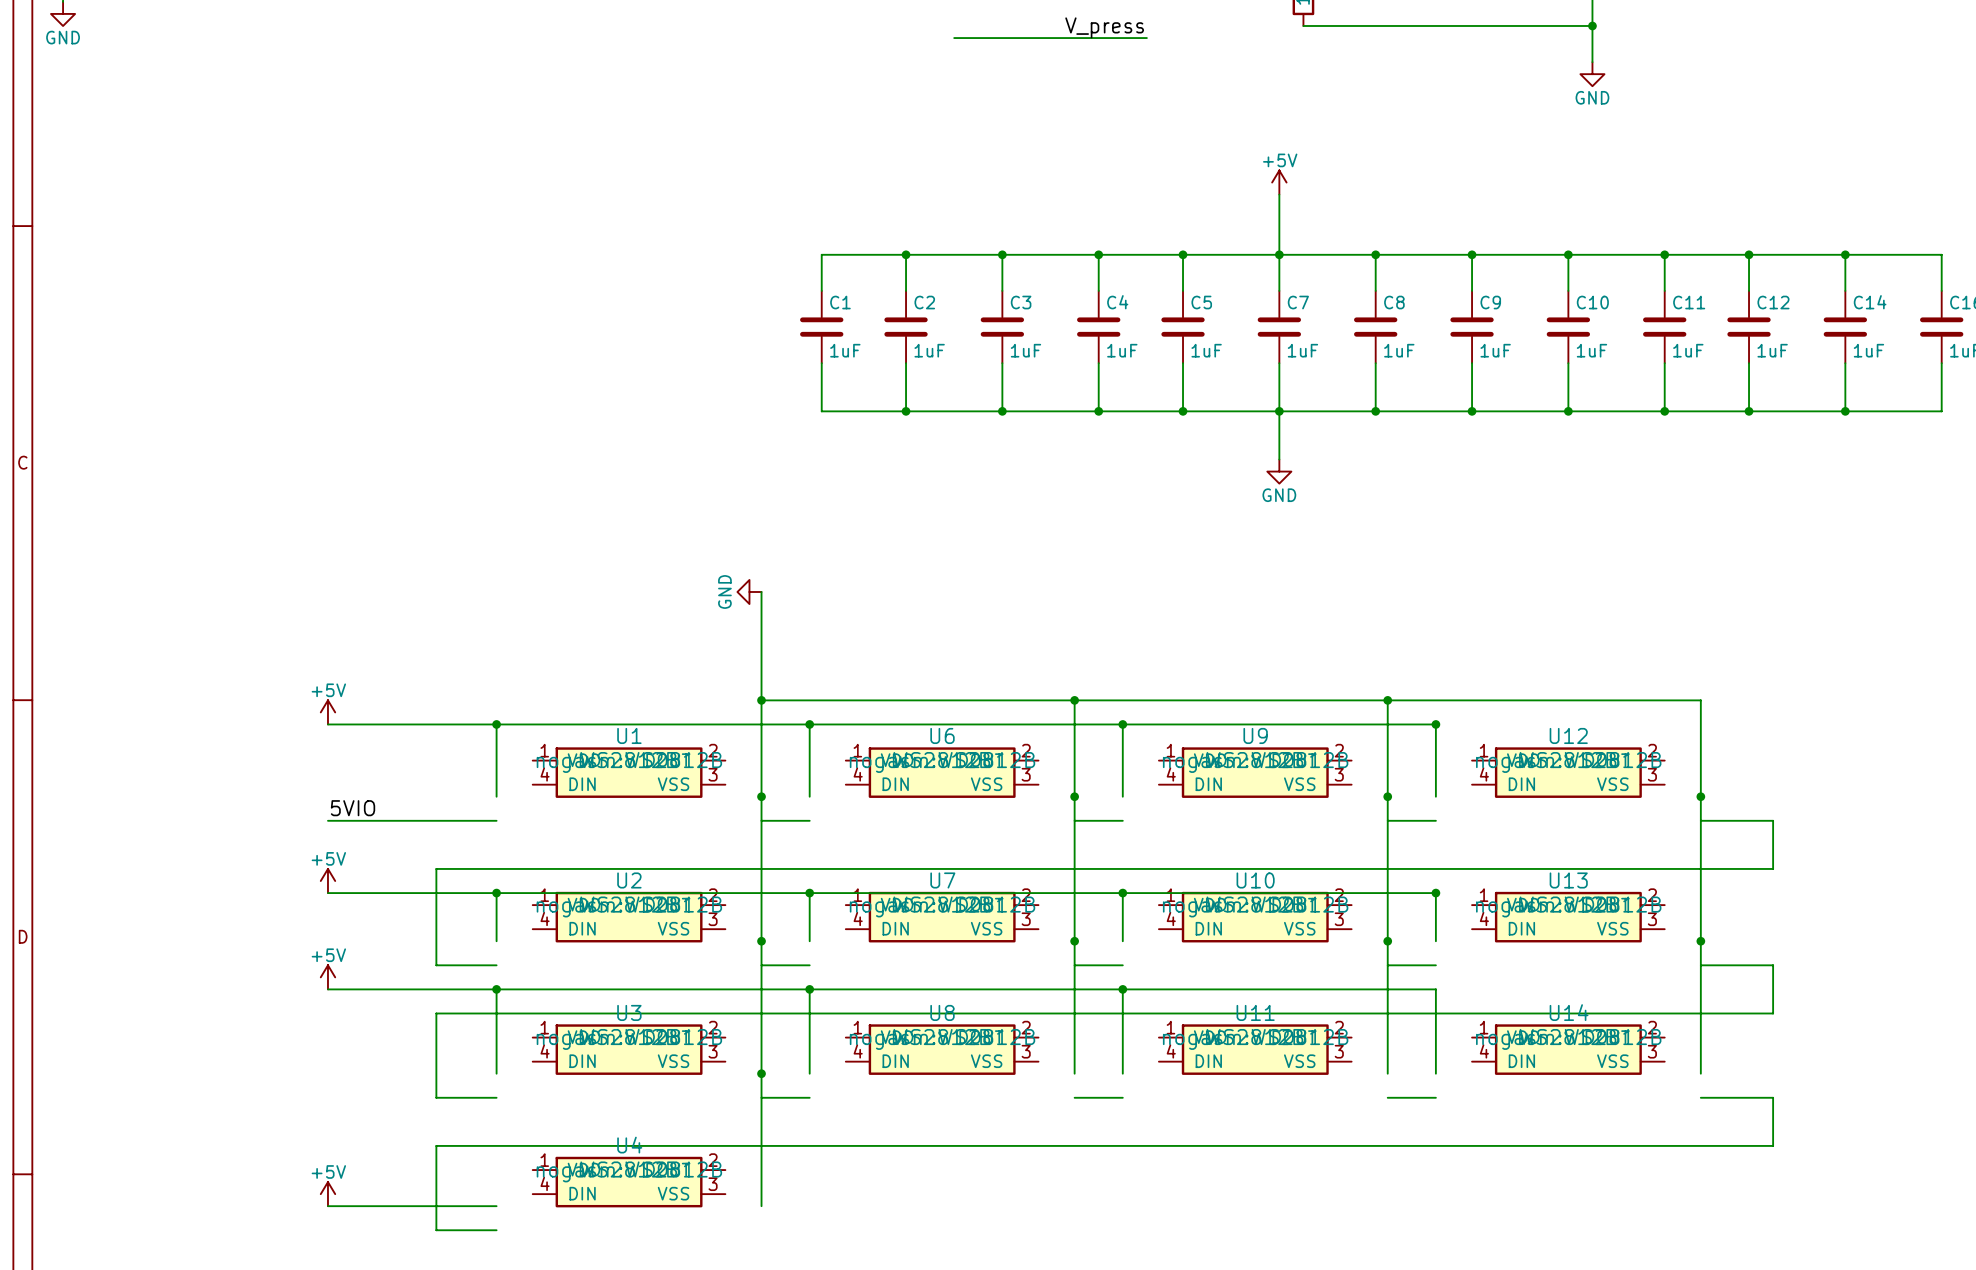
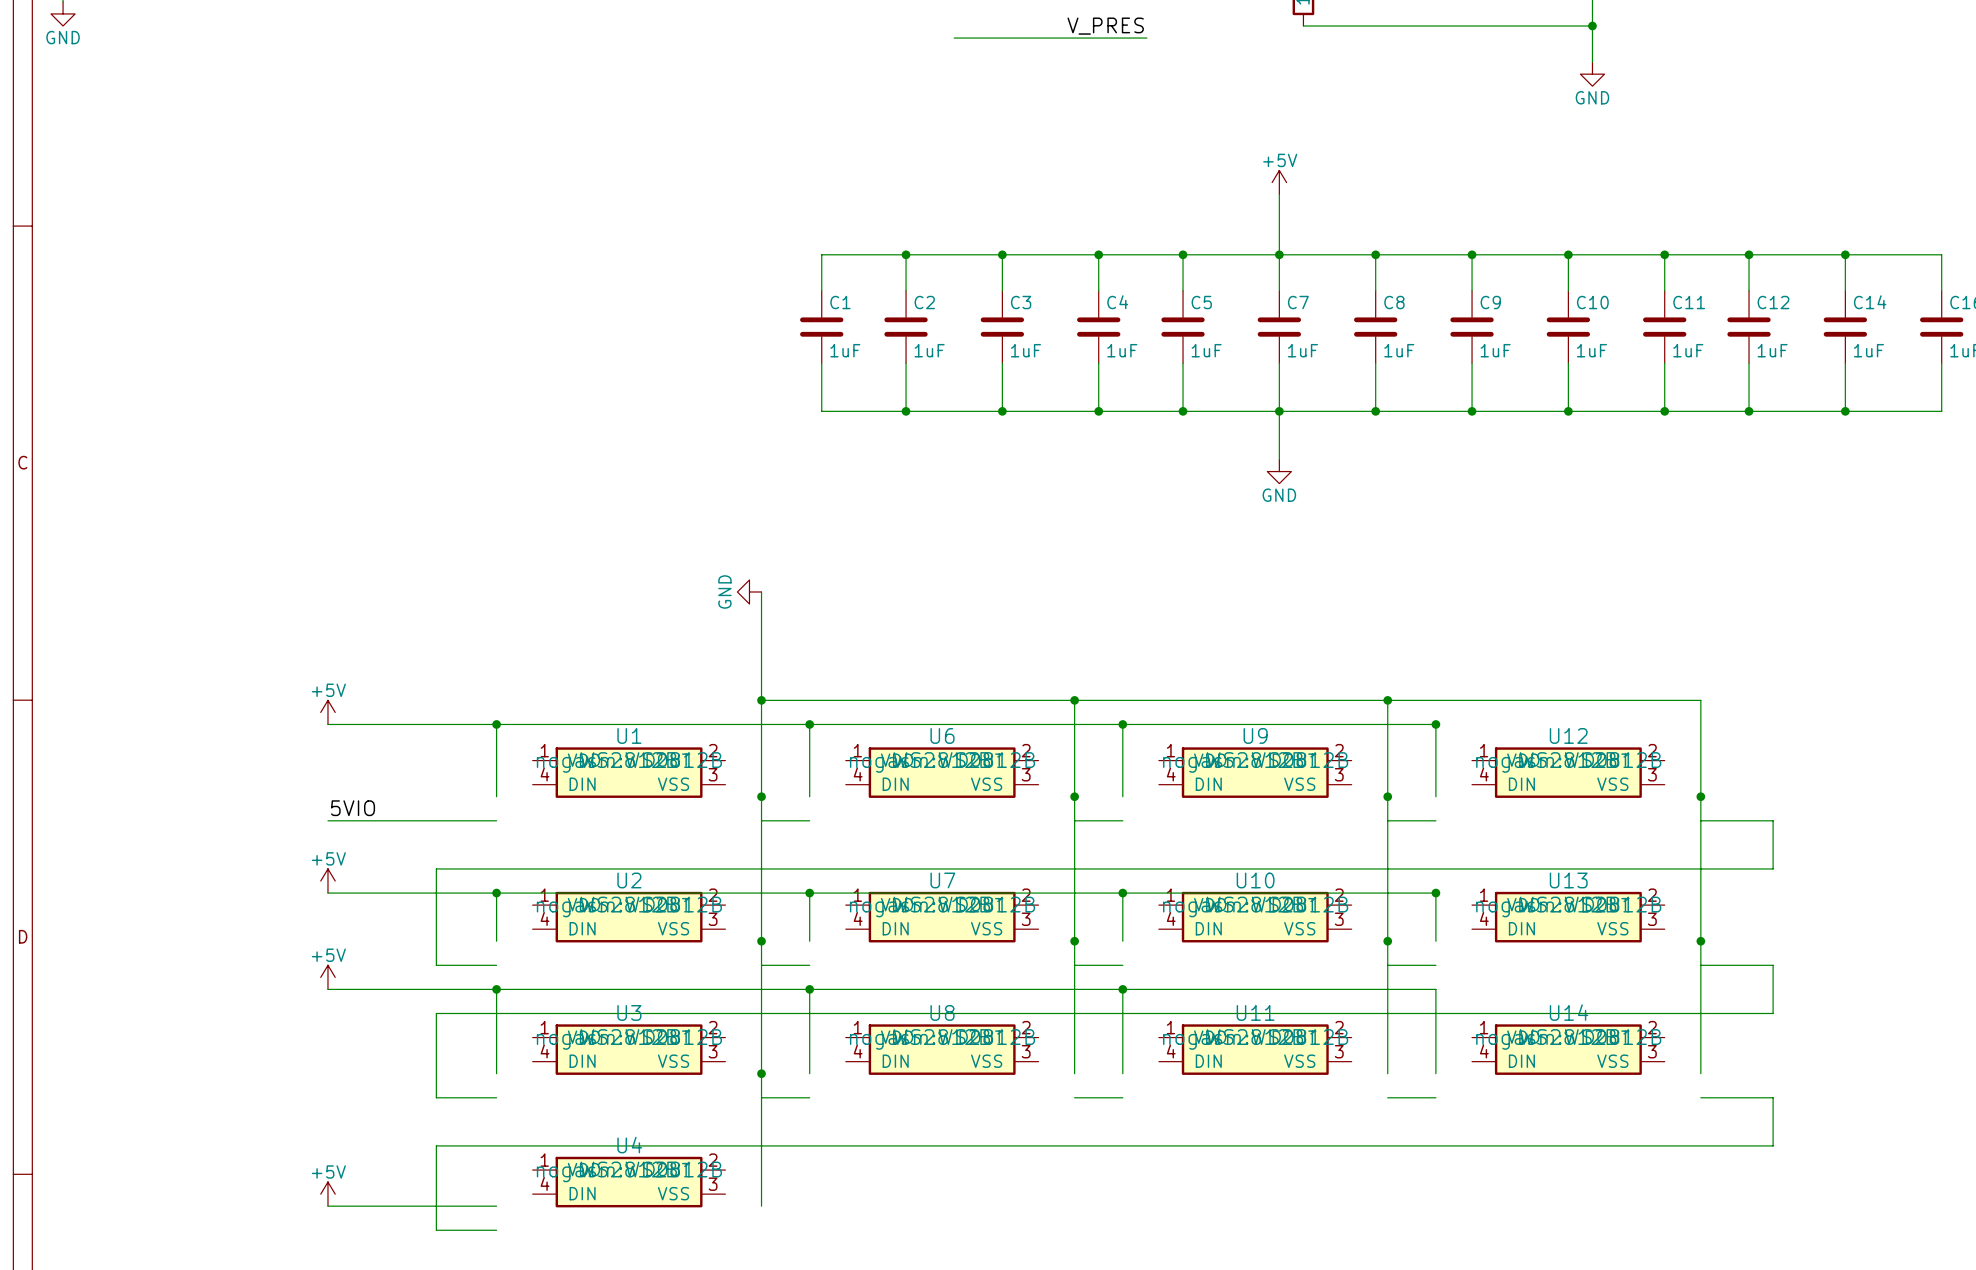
label: V_press (1104, 27) -> V_PRES (1105, 26)

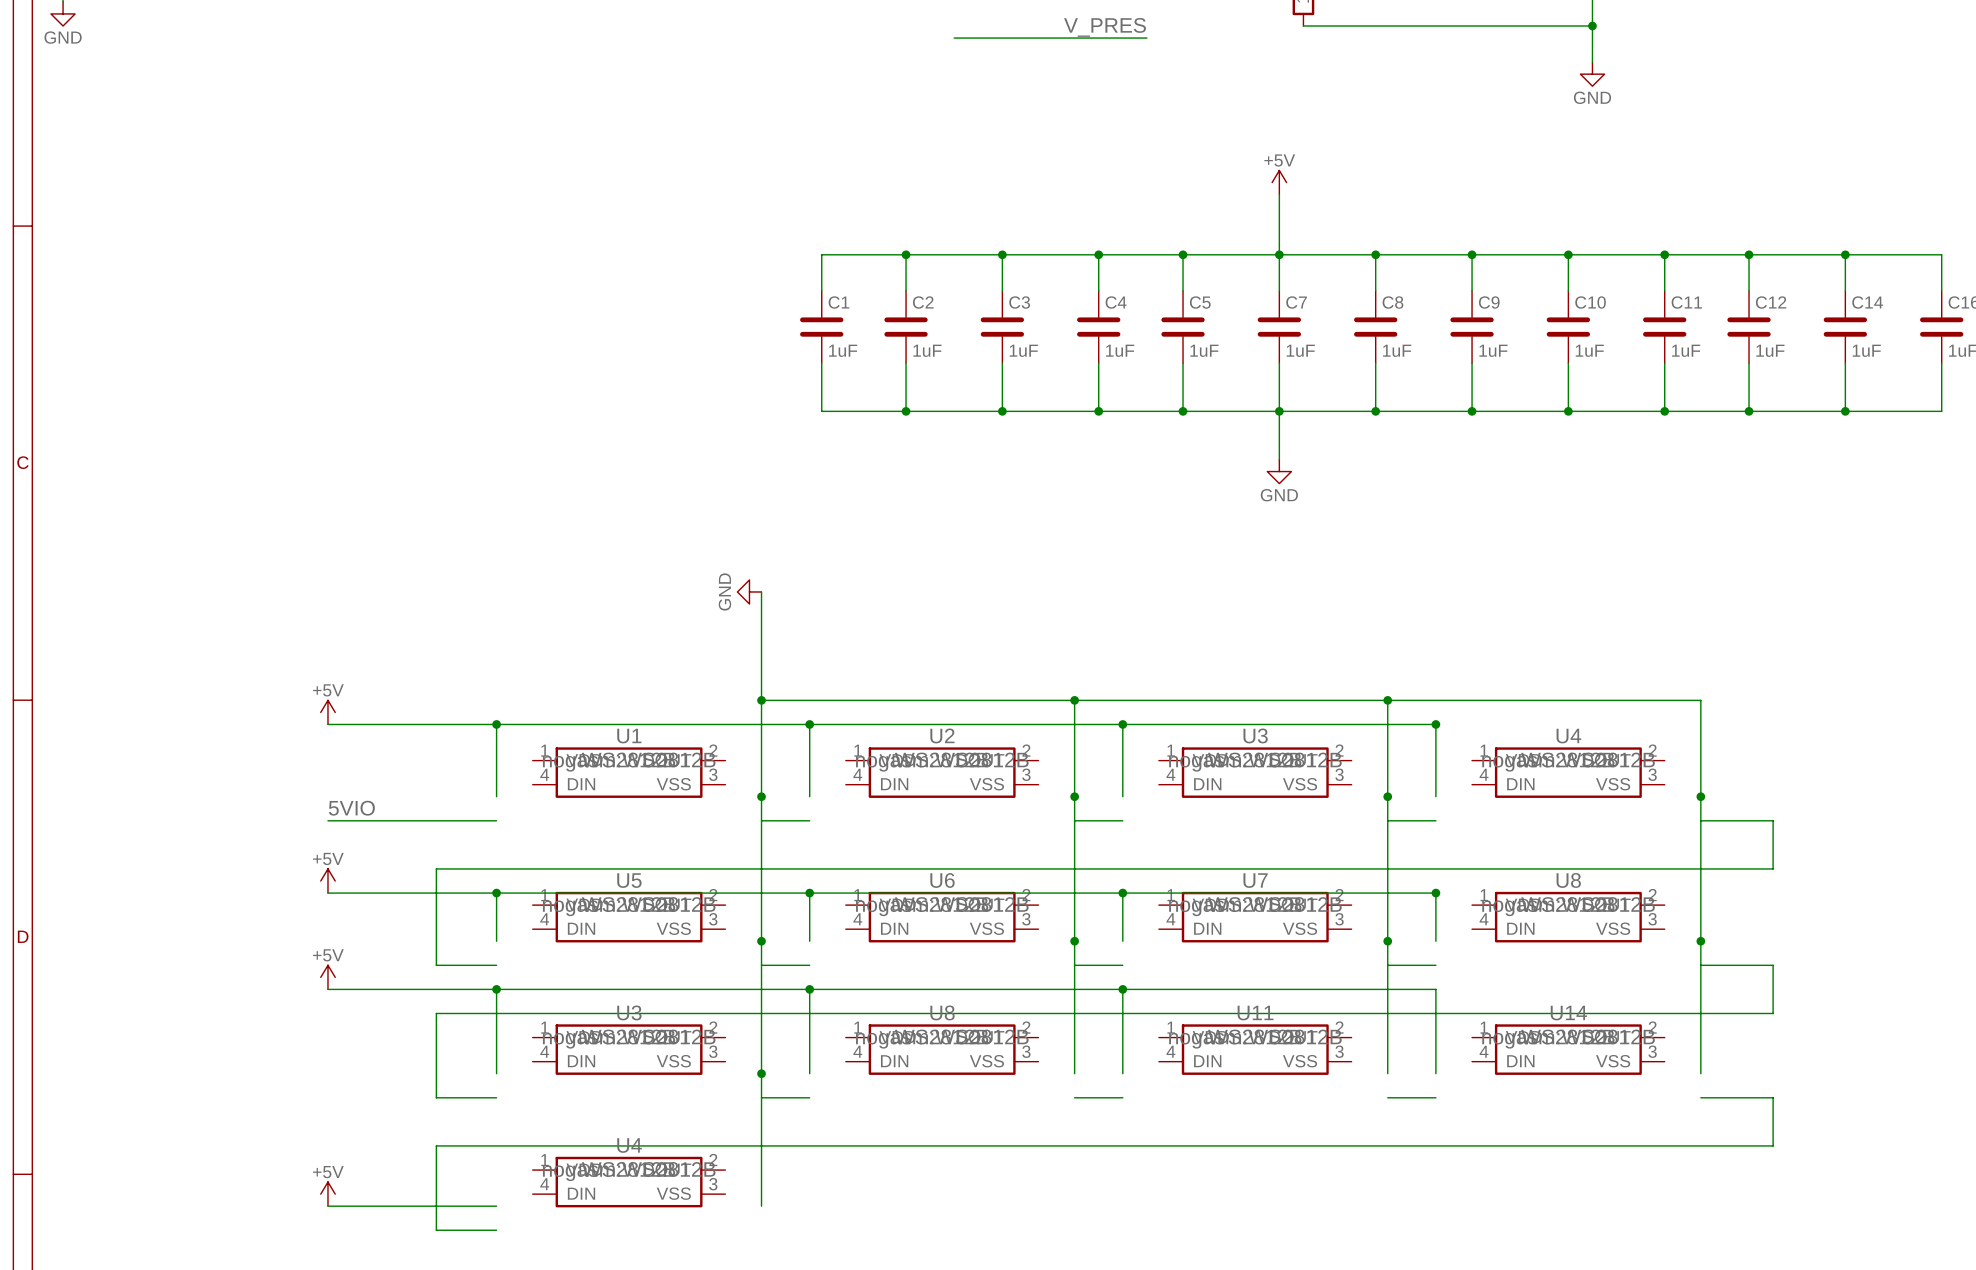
U6 name: U6 (942, 735) -> U2 (942, 735)
U9 name: U9 (1255, 735) -> U3 (1255, 735)
U12 name: U12 (1568, 735) -> U4 (1568, 736)
U2 name: U2 (629, 880) -> U5 (629, 880)
U7 name: U7 (942, 880) -> U6 (942, 880)
U10 name: U10 (1255, 880) -> U7 (1255, 880)
U13 name: U13 (1568, 880) -> U8 (1568, 880)

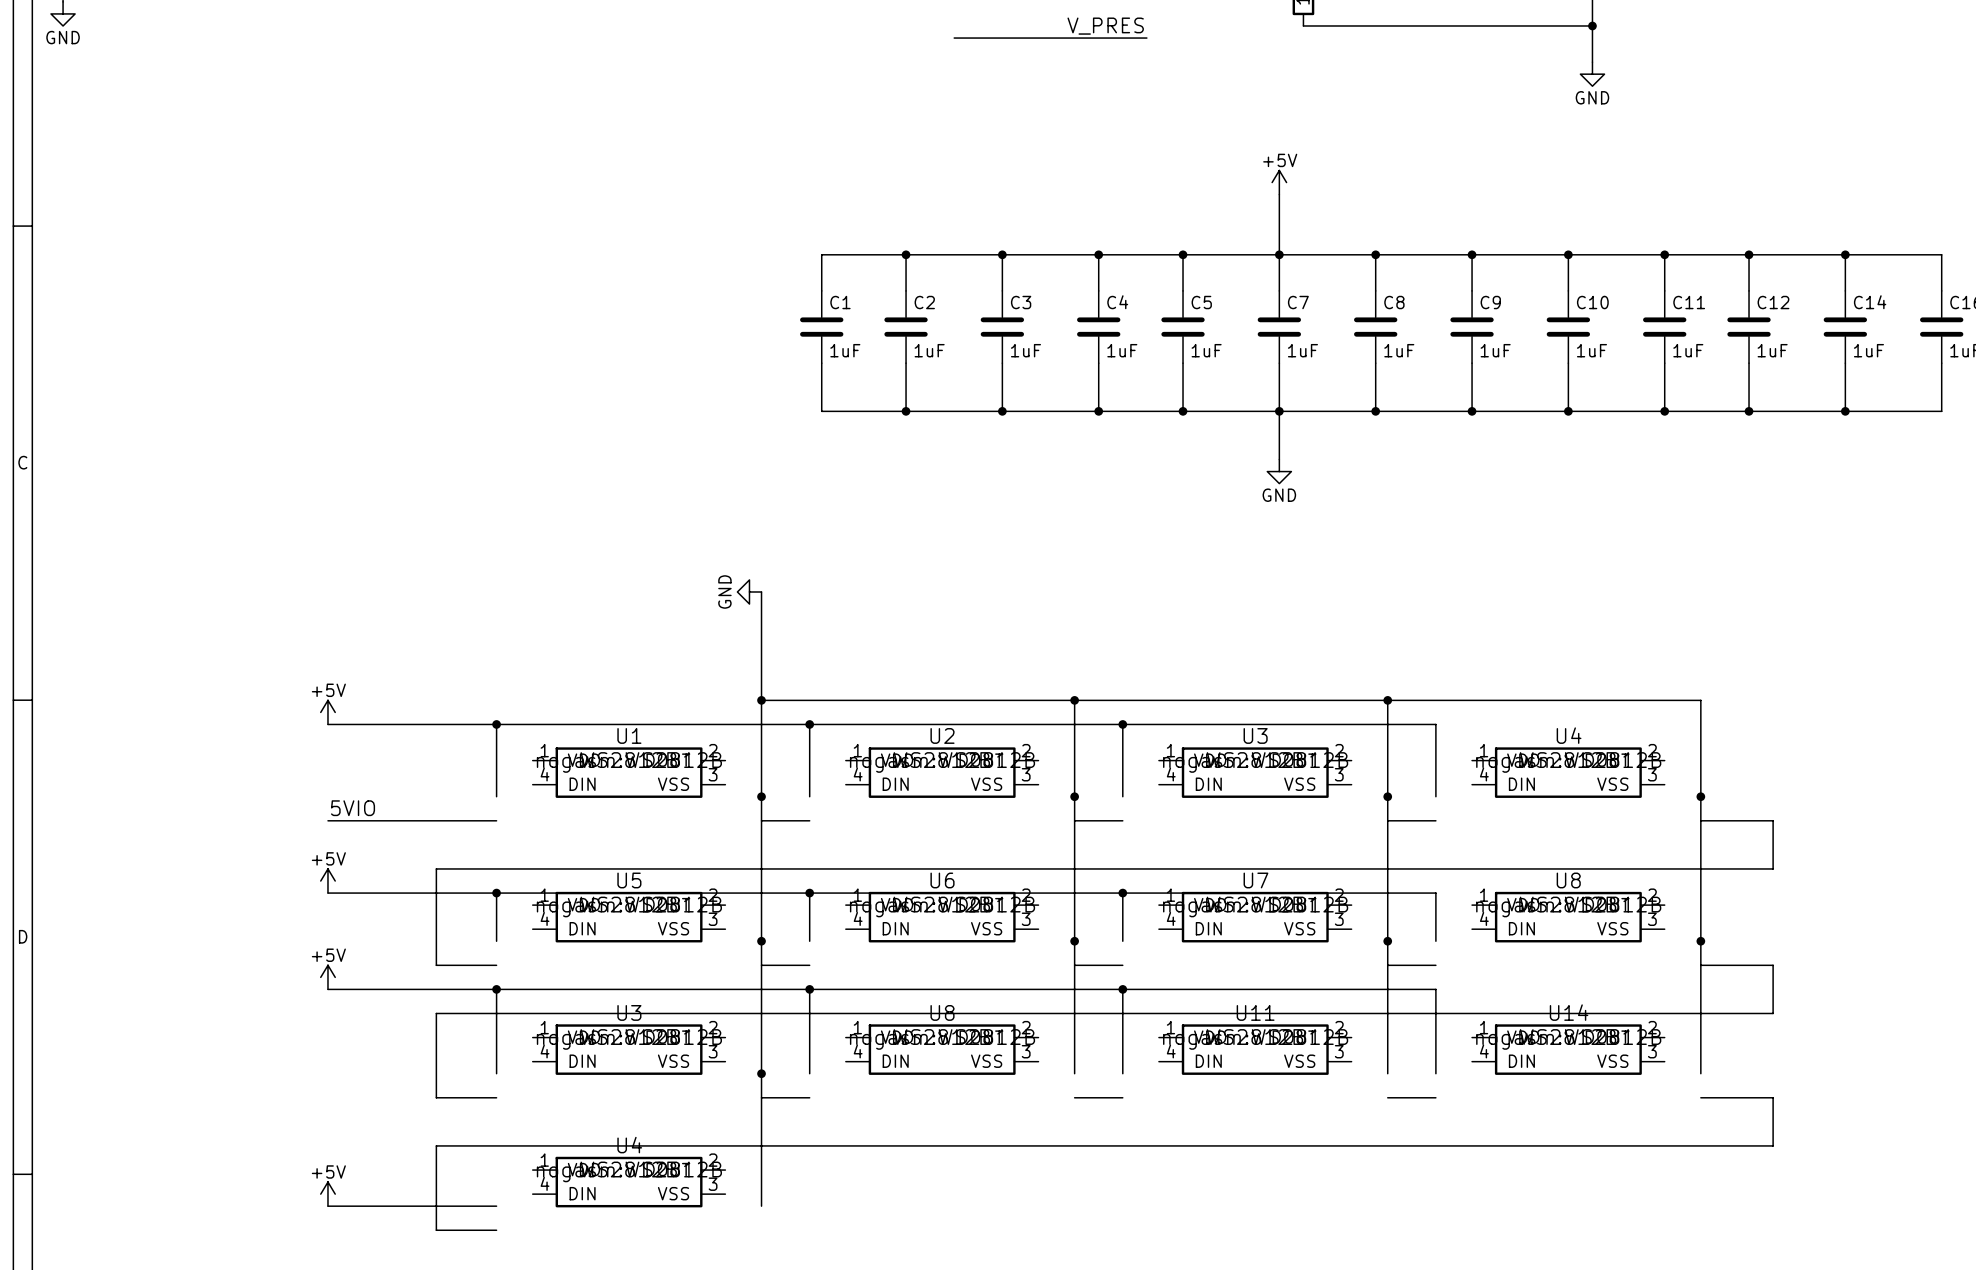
junction: (1435, 724) -> none
junction: (1435, 893) -> none

